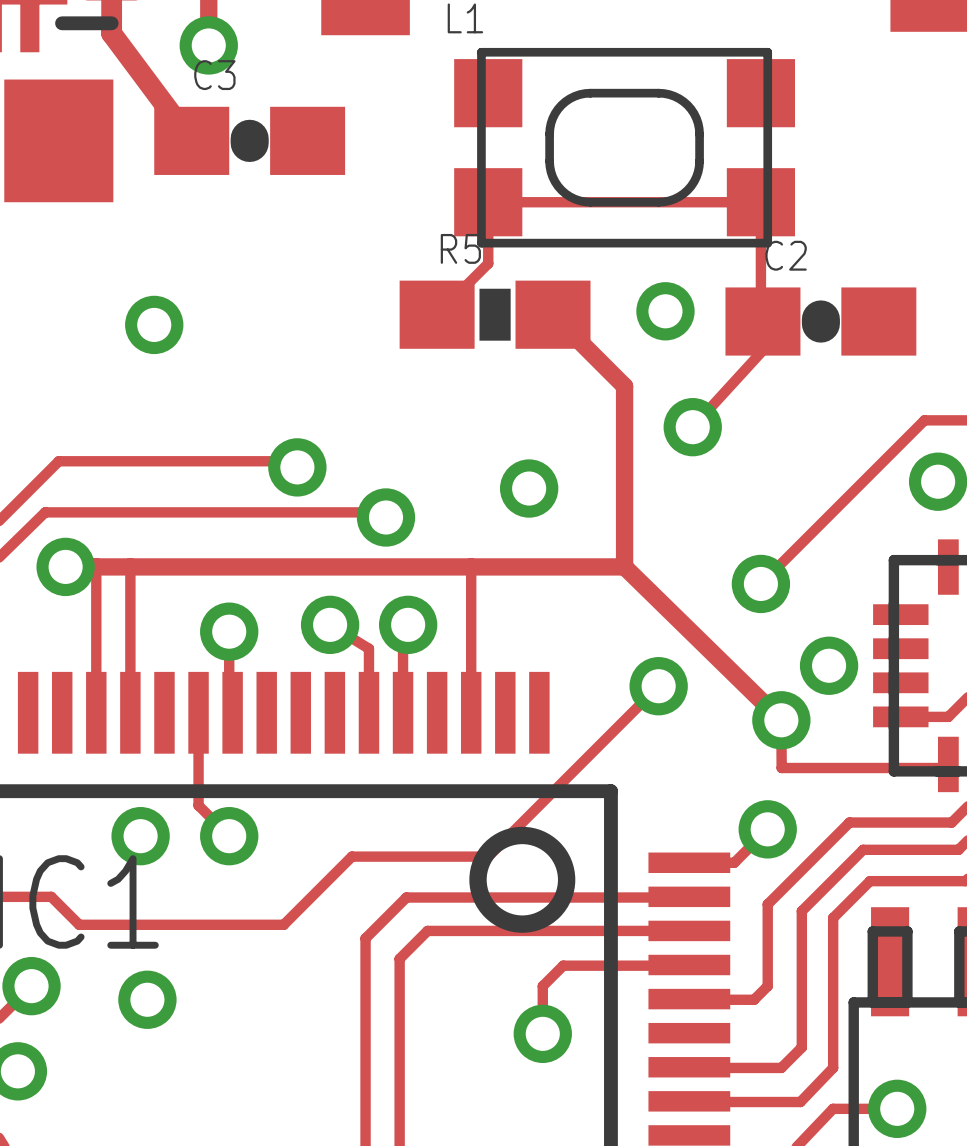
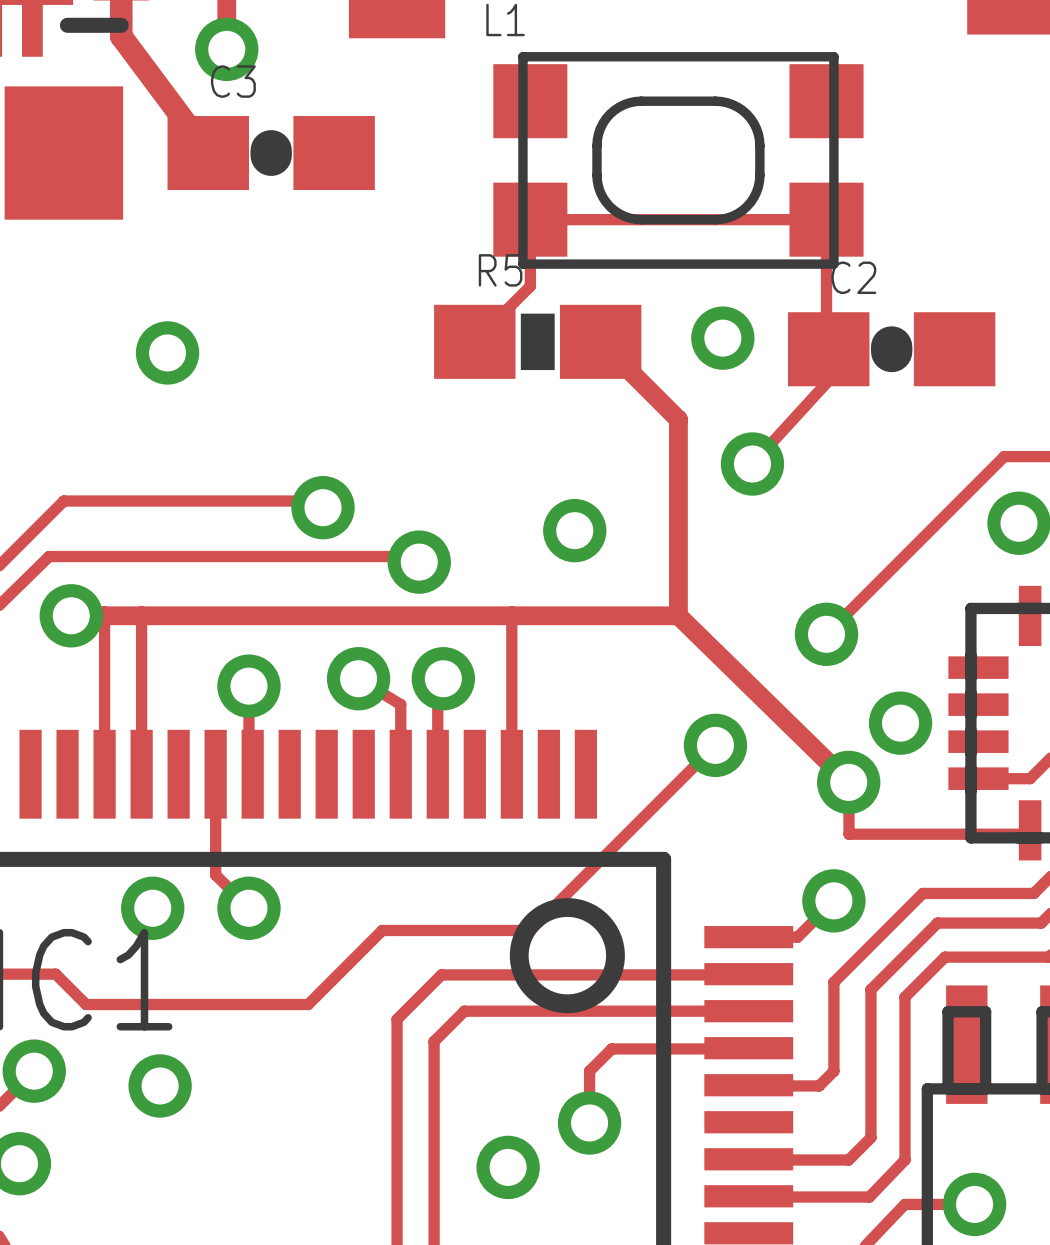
via: none -> (508, 1167)

